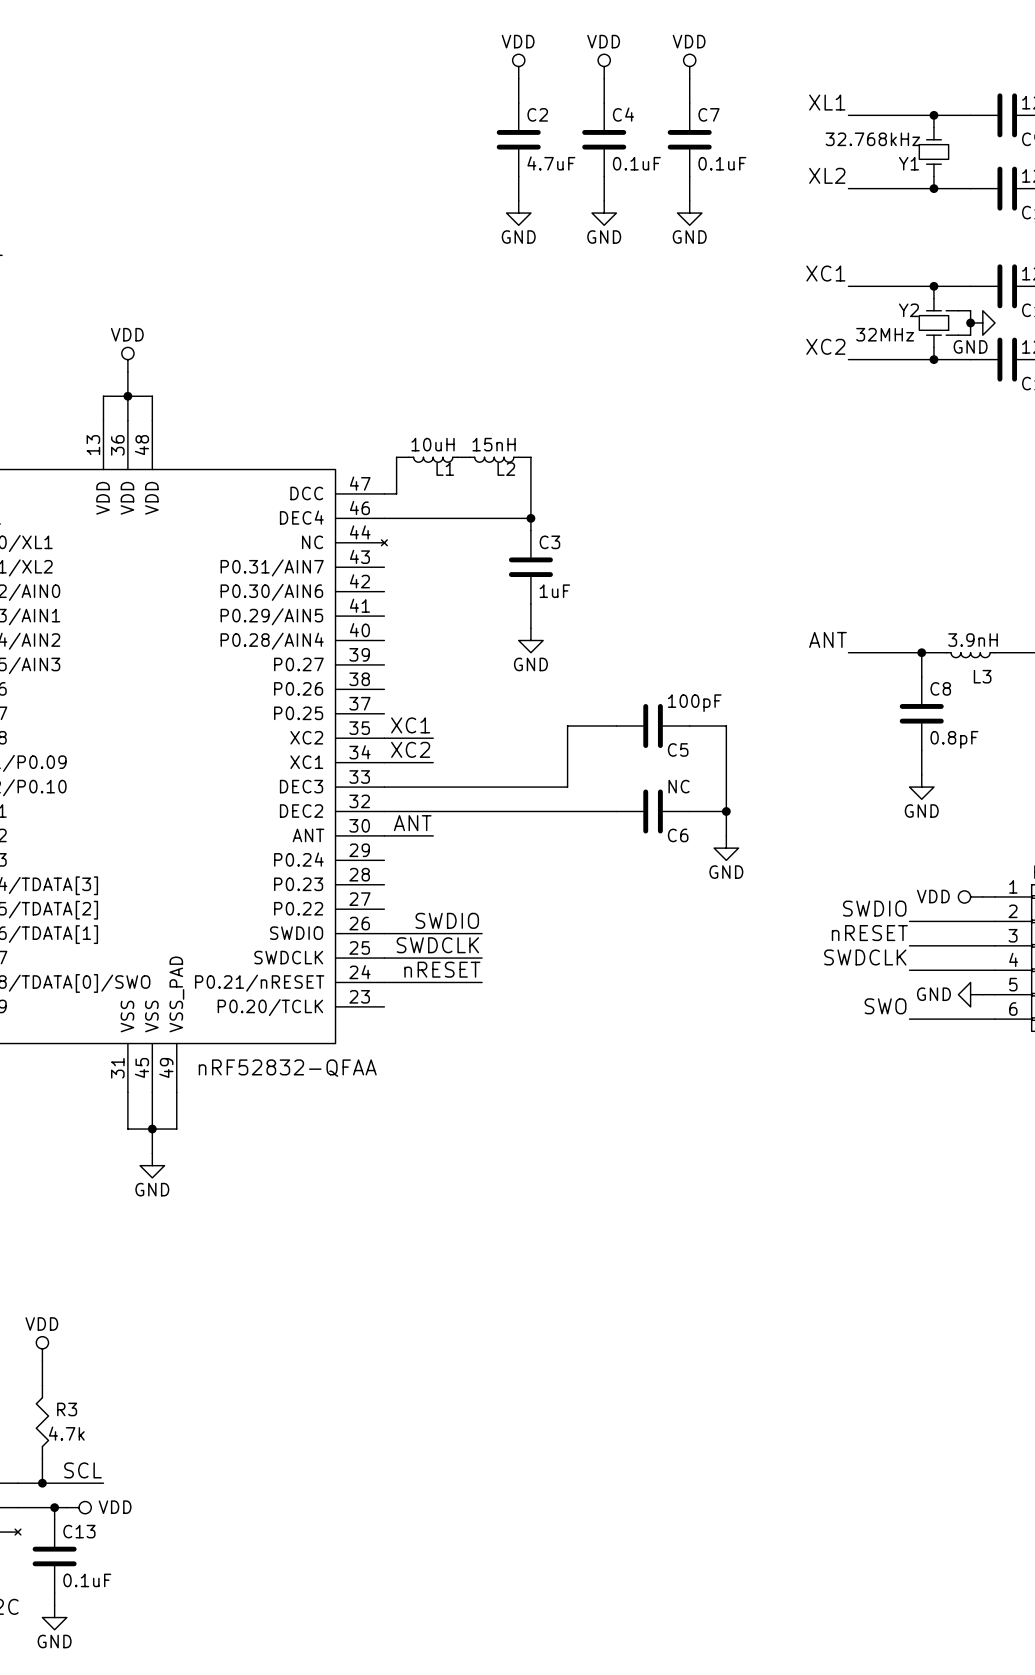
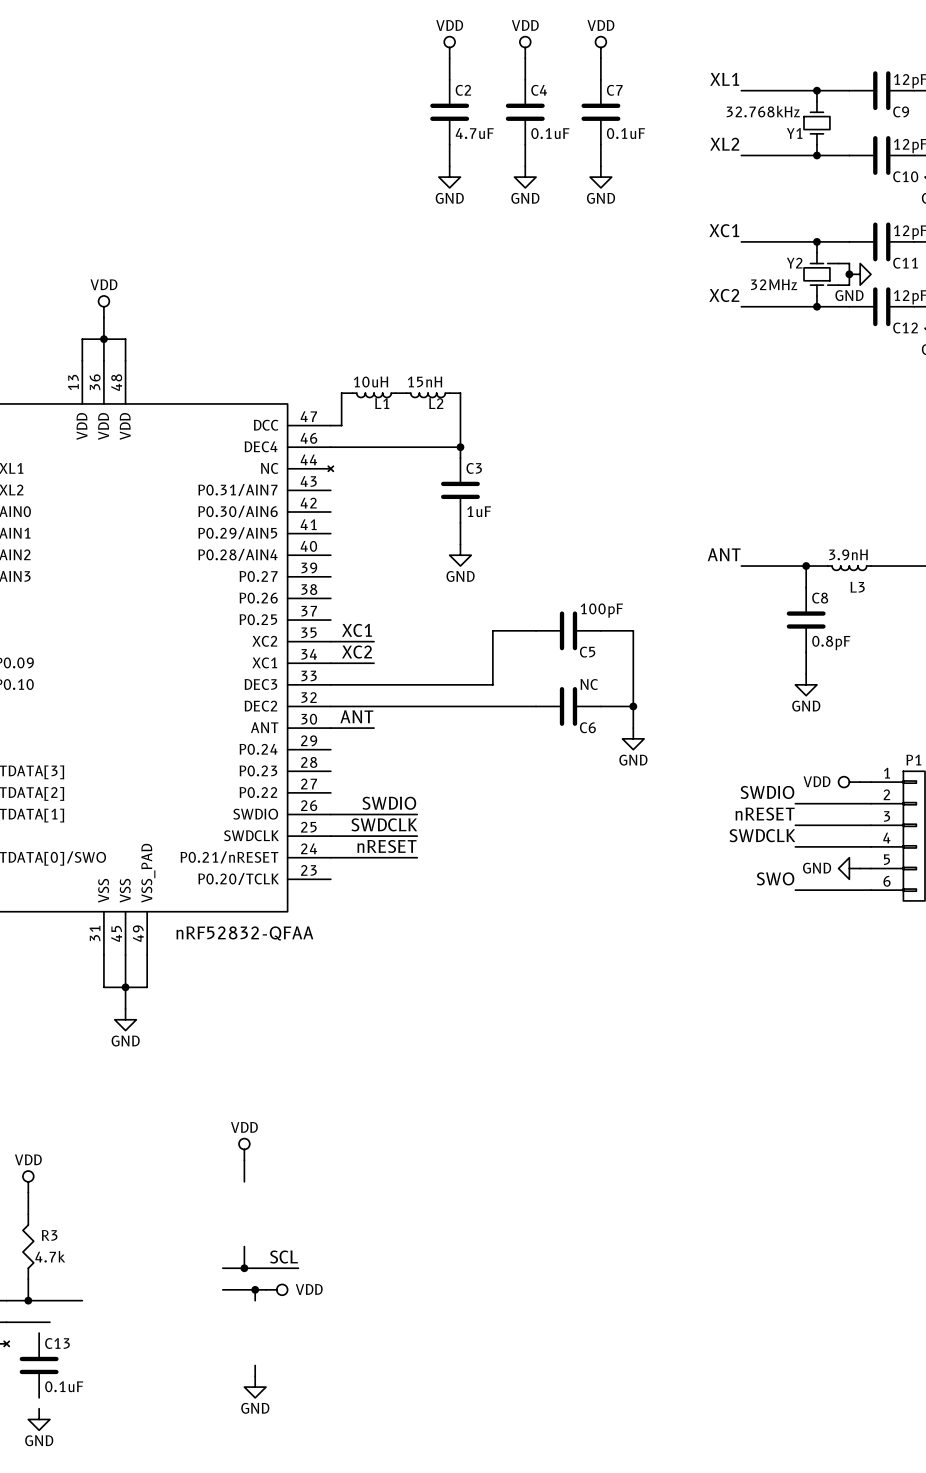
power symbol: none -> VDD (244, 1149)
wire: none -> (244, 1160) (244, 1181)
wire: none -> (244, 1246) (244, 1268)
label: none -> SCL (284, 1257)
wire: none -> (222, 1268) (298, 1268)
junction: none -> (244, 1268)
label: SCL (82, 1470) -> none
wire: none -> (222, 1289) (266, 1289)
wire: none -> (255, 1289) (255, 1300)
junction: none -> (255, 1289)
power symbol: none -> VDD (276, 1289)
wire: (54, 1507) (54, 1519) -> none
junction: (54, 1507) -> none
power symbol: VDD (79, 1507) -> none
wire: none -> (255, 1365) (255, 1376)
power symbol: none -> GND (255, 1387)
wire: (54, 1593) (54, 1605) -> none

